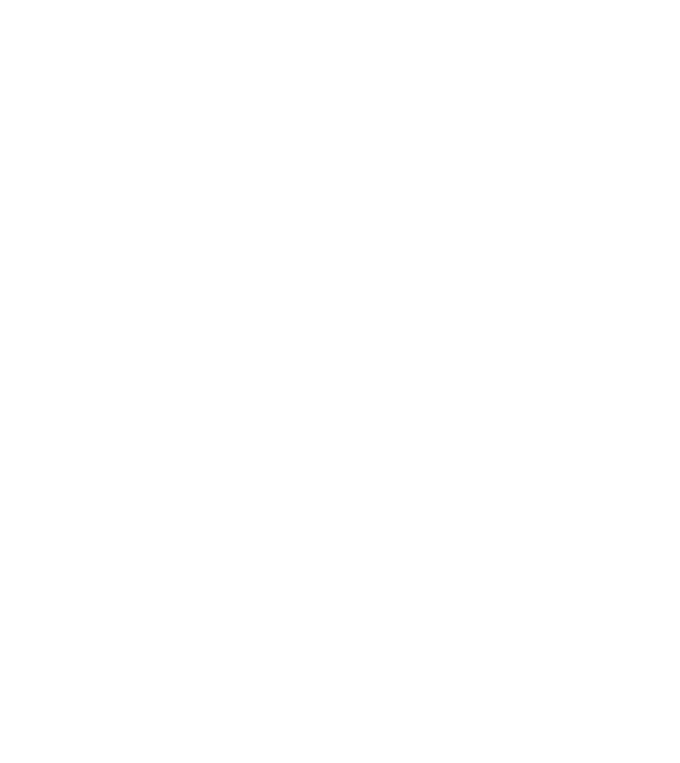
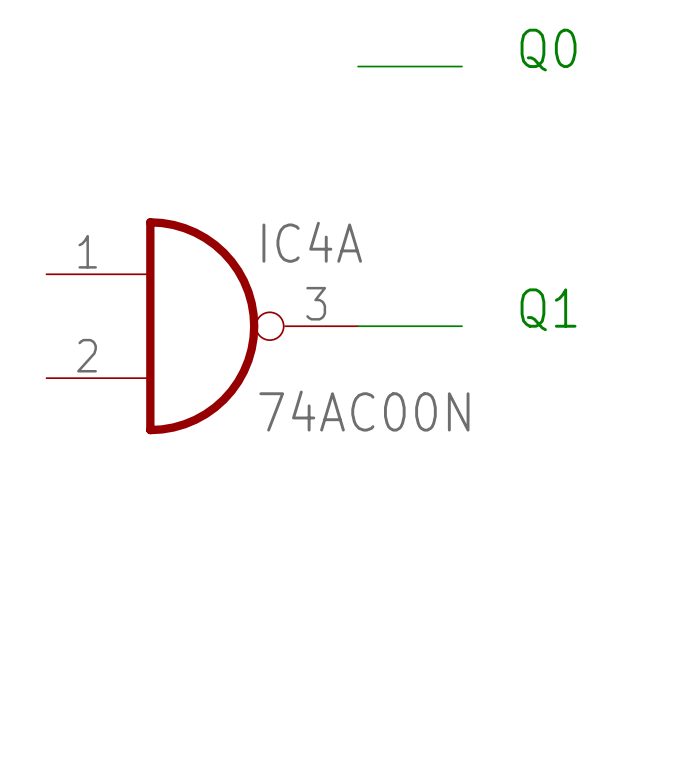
text: none -> Q0 (548, 50)
wire: none -> (358, 66) (461, 66)
text: none -> Q1 (548, 309)
IC4A: none -> 74AC00N (202, 326)
wire: none -> (358, 326) (461, 326)

